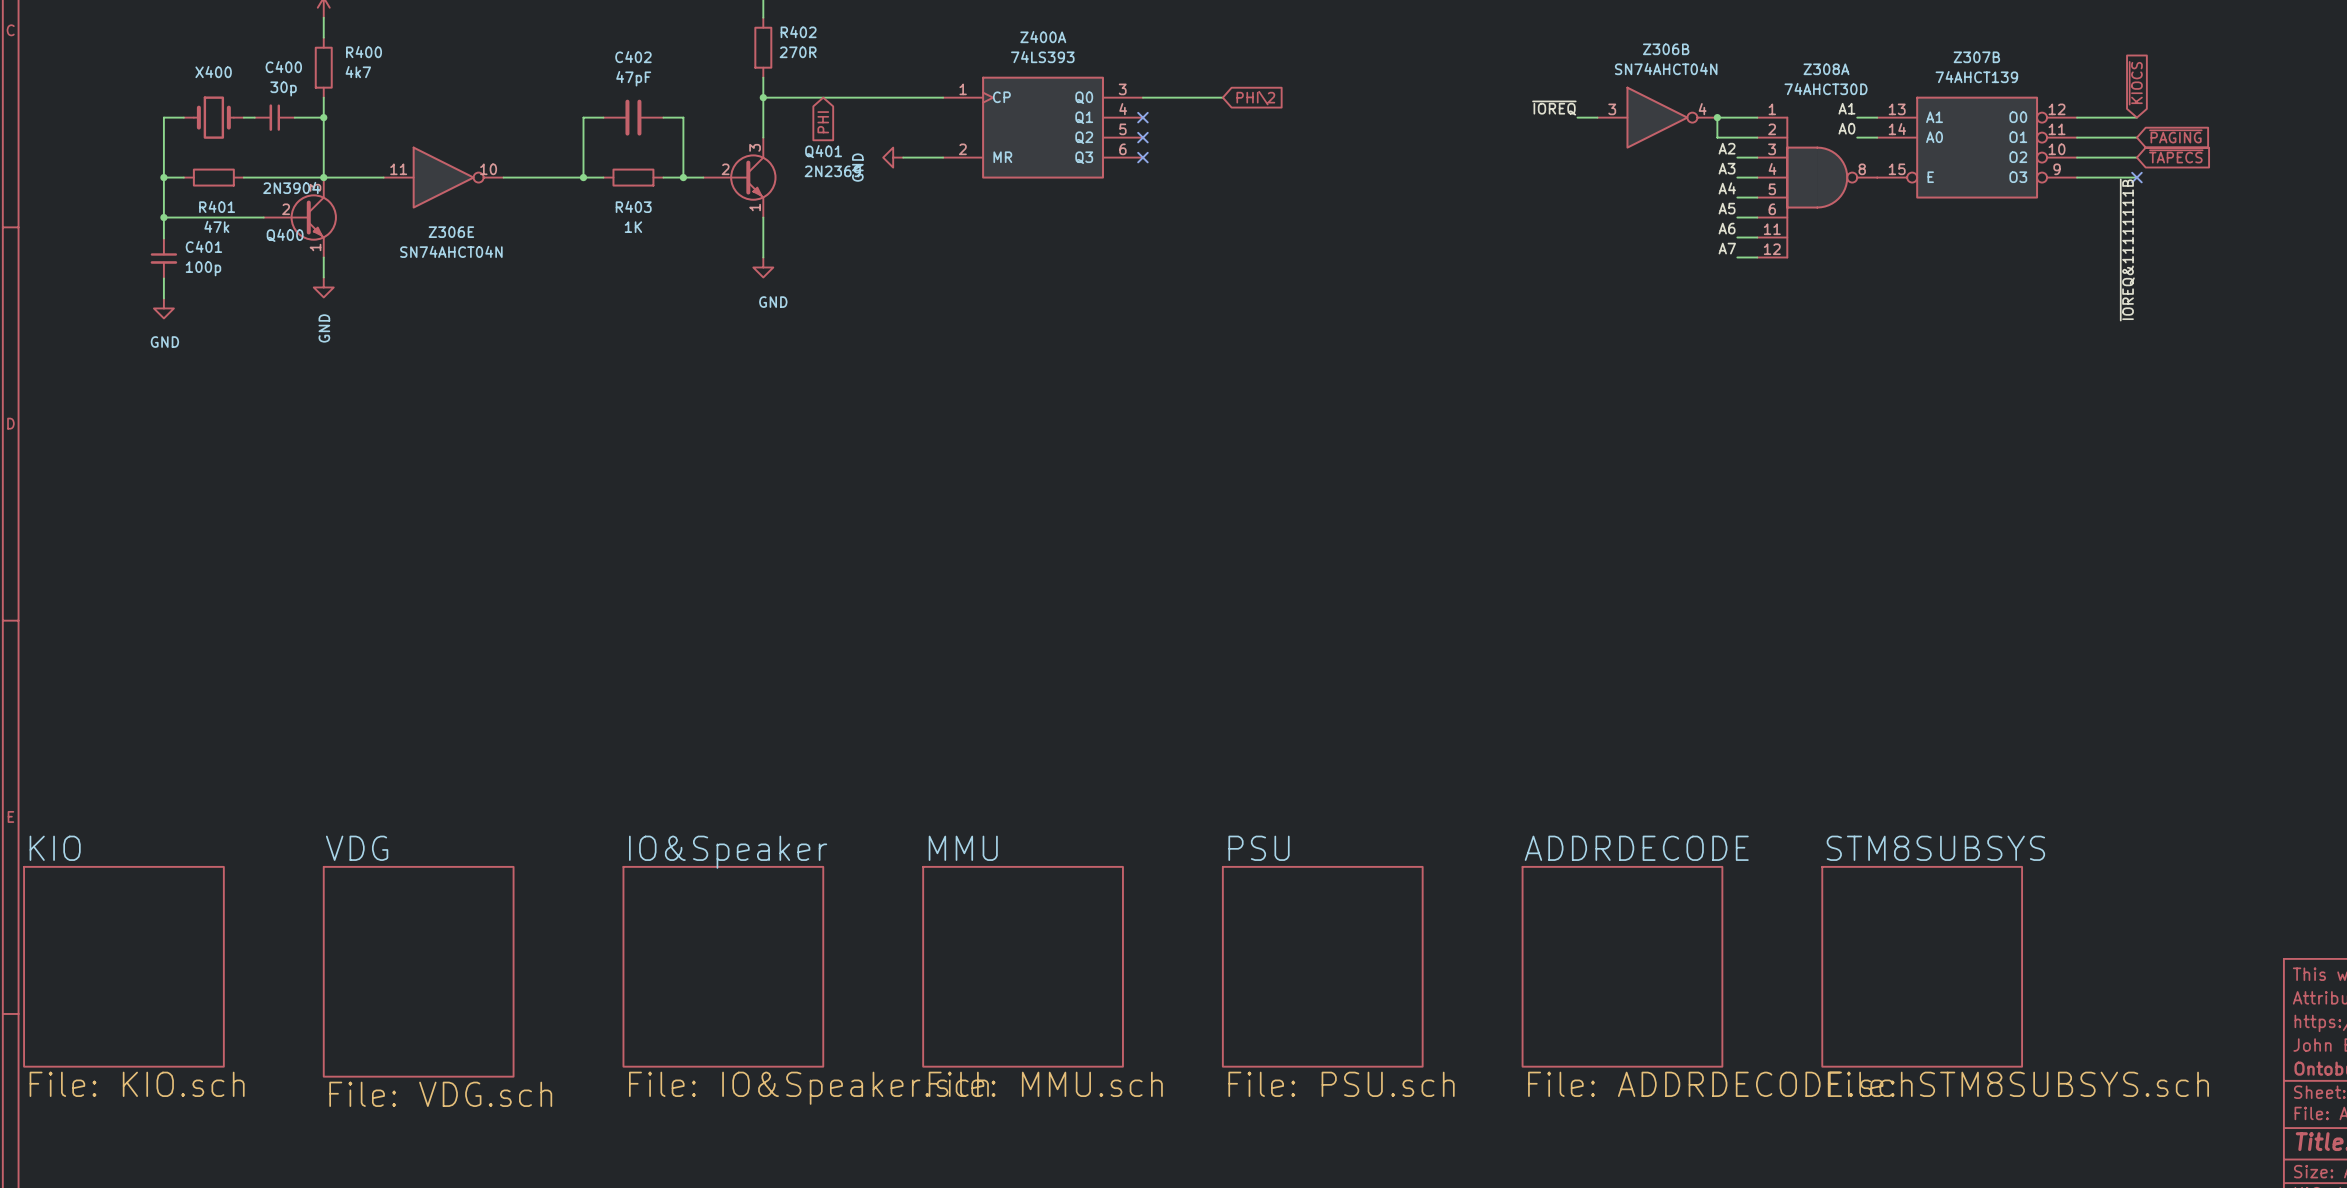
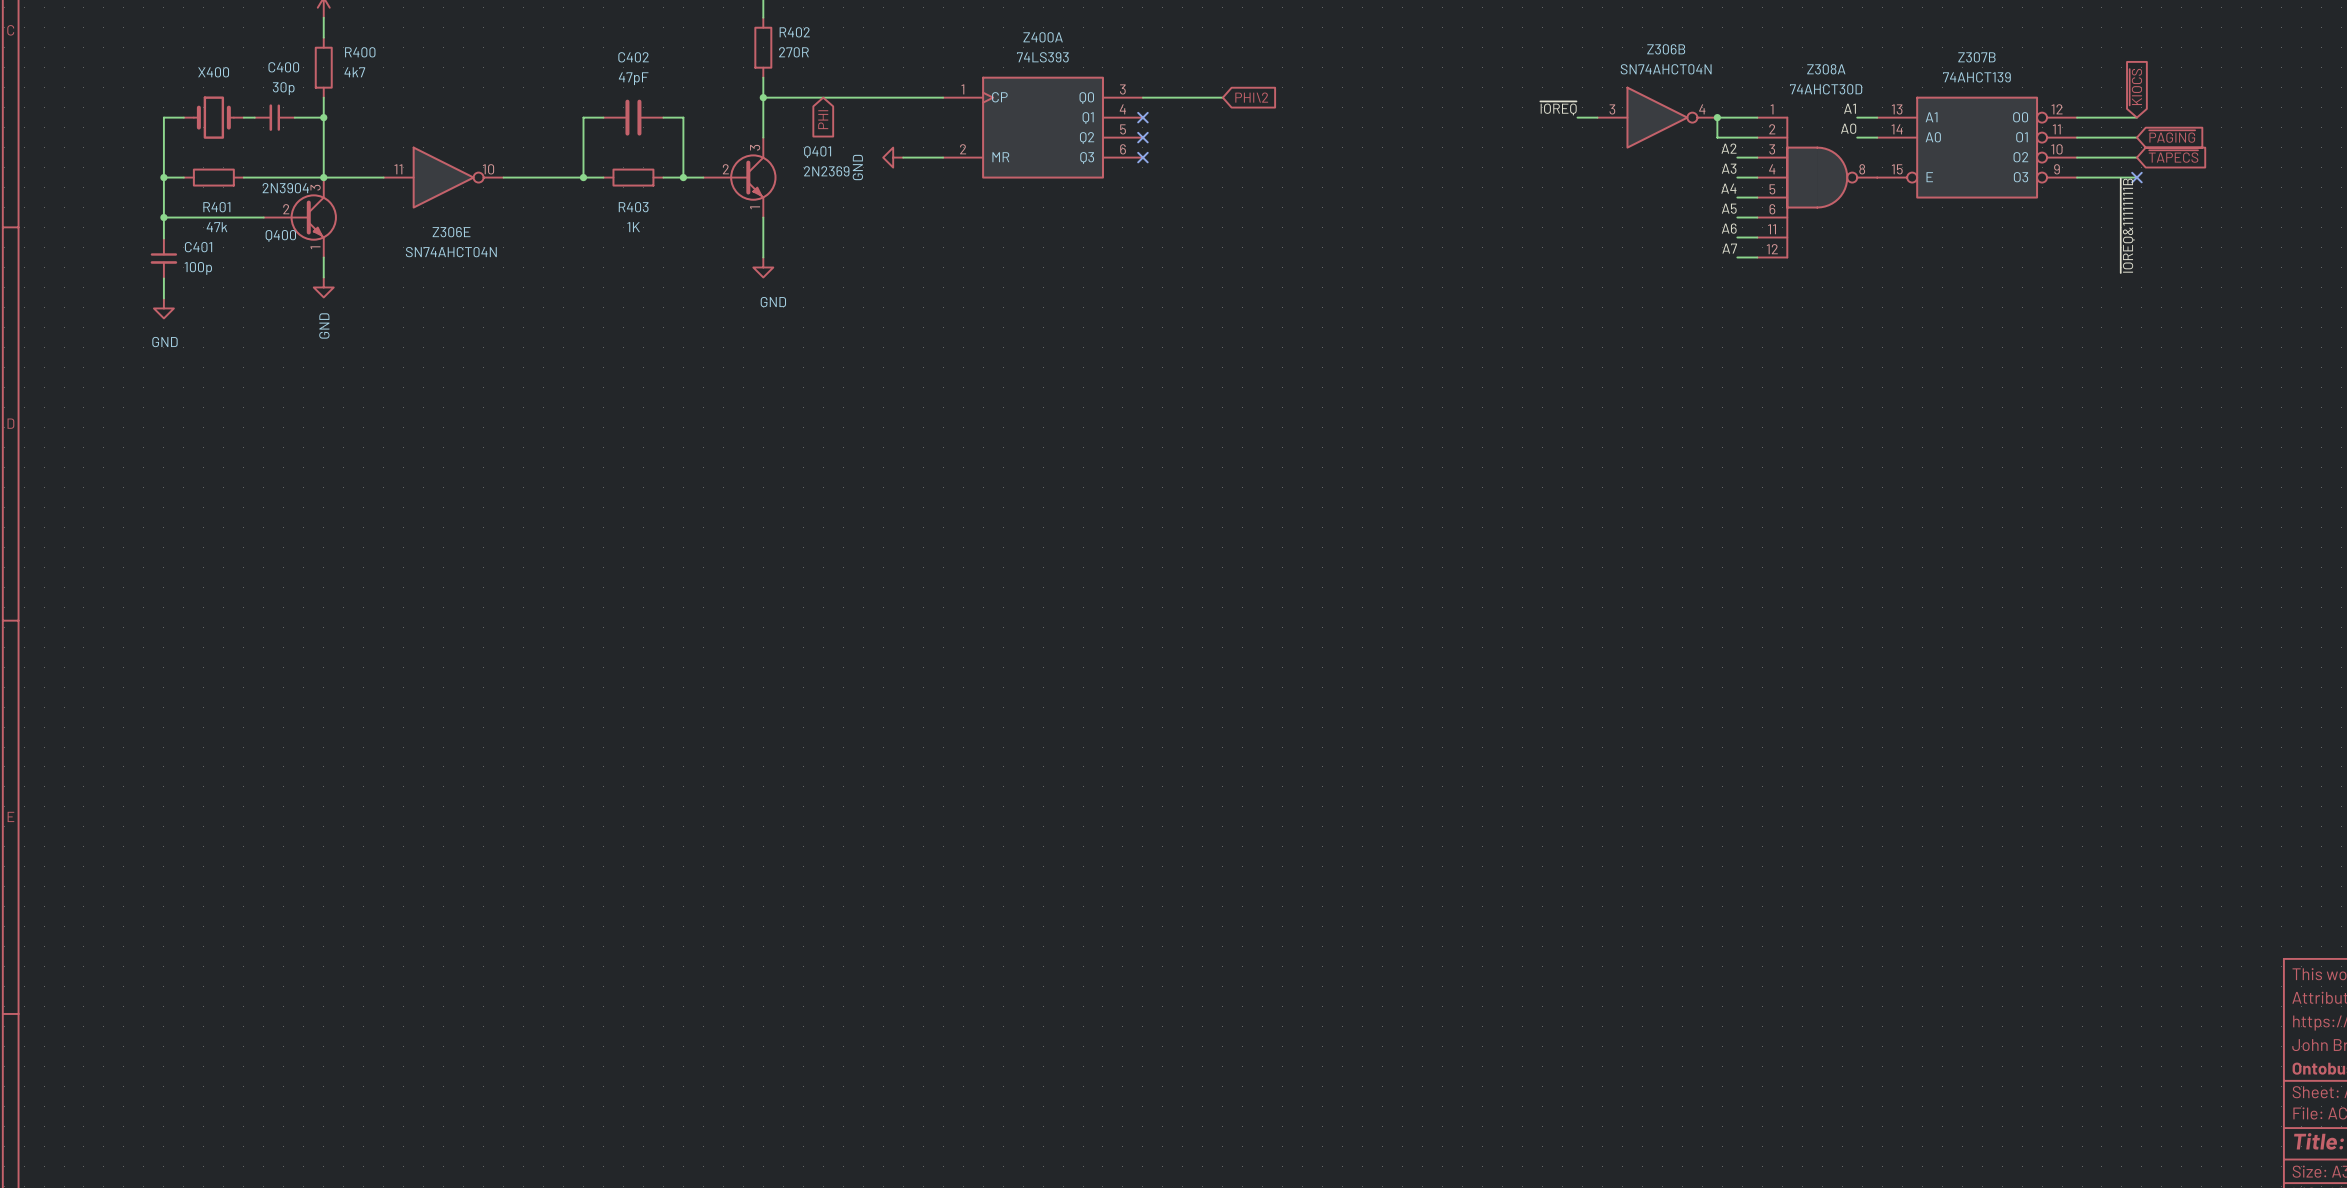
sheet KIO: File: KIO.sch (123, 966) -> none
sheet IO&Speaker: File: IO&Speaker.sch (723, 966) -> none
sheet MMU: File: MMU.sch (1023, 966) -> none
sheet PSU: File: PSU.sch (1322, 966) -> none
sheet ADDRDECODE: File: ADDRDECODE.sch (1622, 966) -> none
sheet STM8SUBSYS: File: STM8SUBSYS.sch (1922, 966) -> none
sheet VDG: File: VDG.sch (418, 971) -> none

